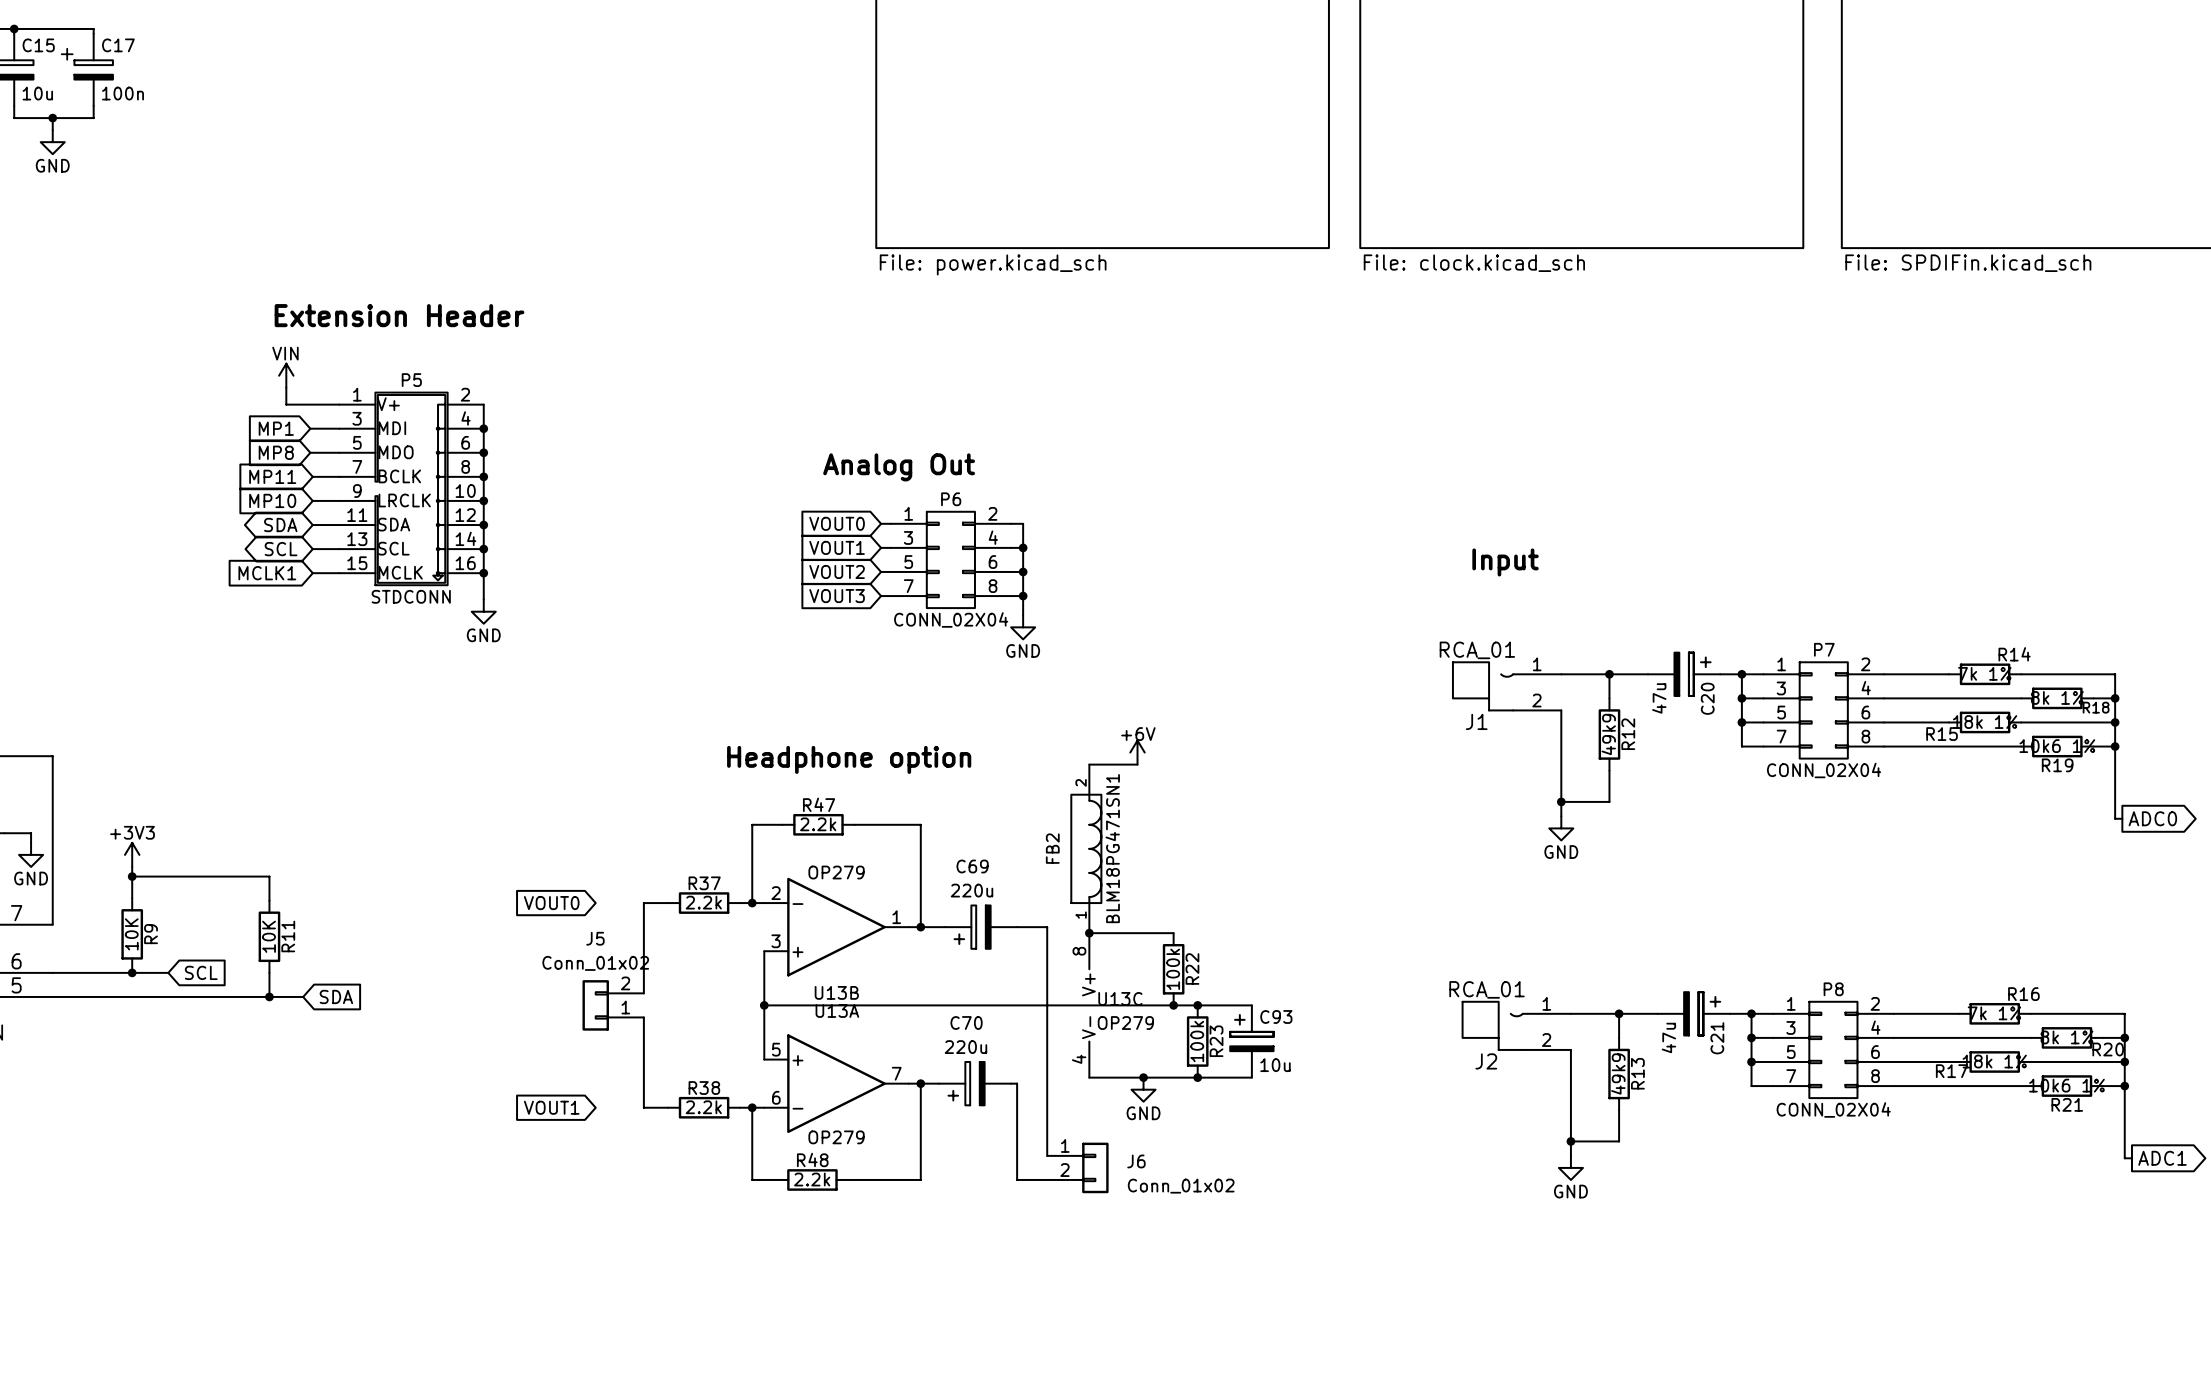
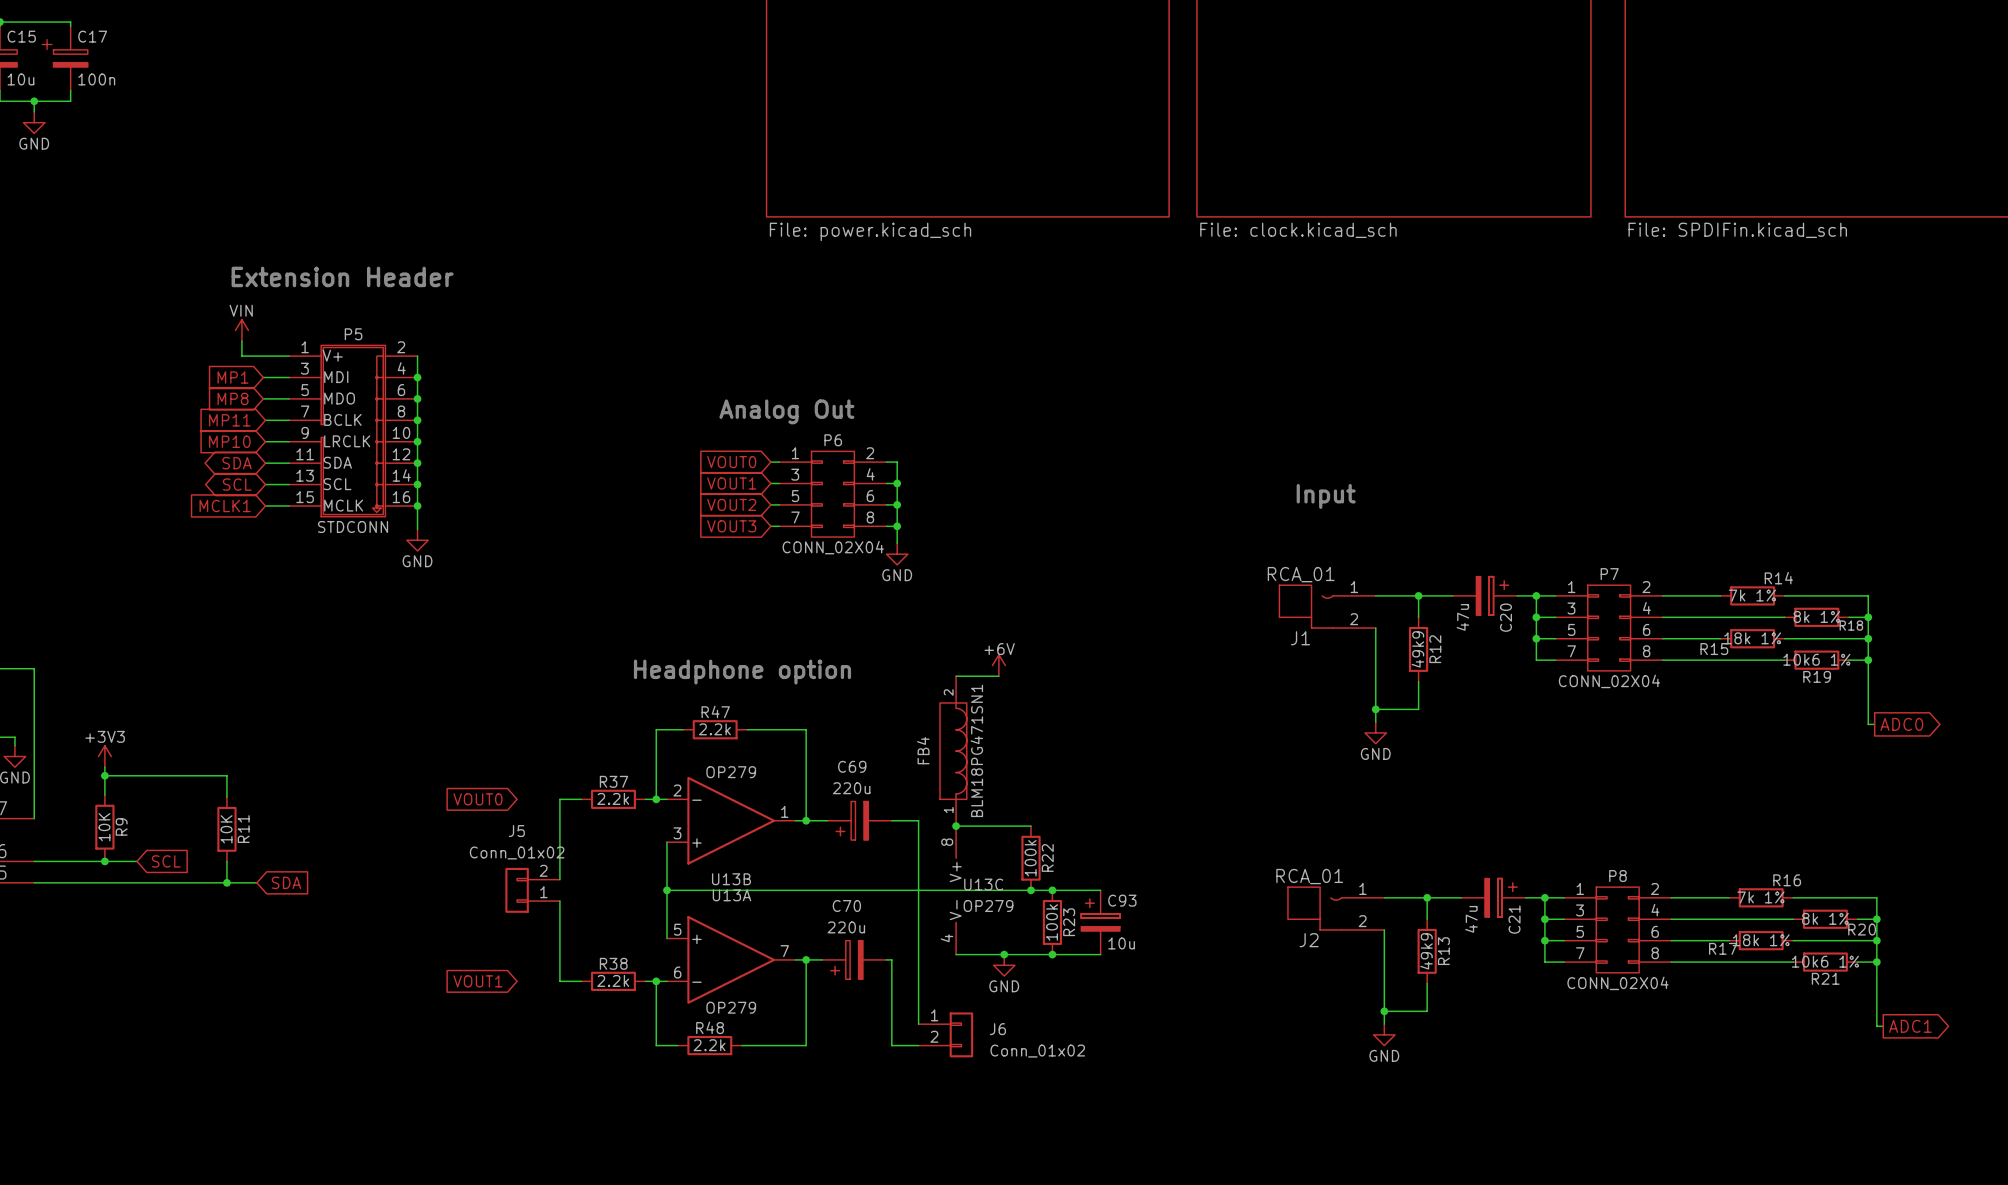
FB2 name: FB2 (1052, 848) -> FB4 (923, 750)

